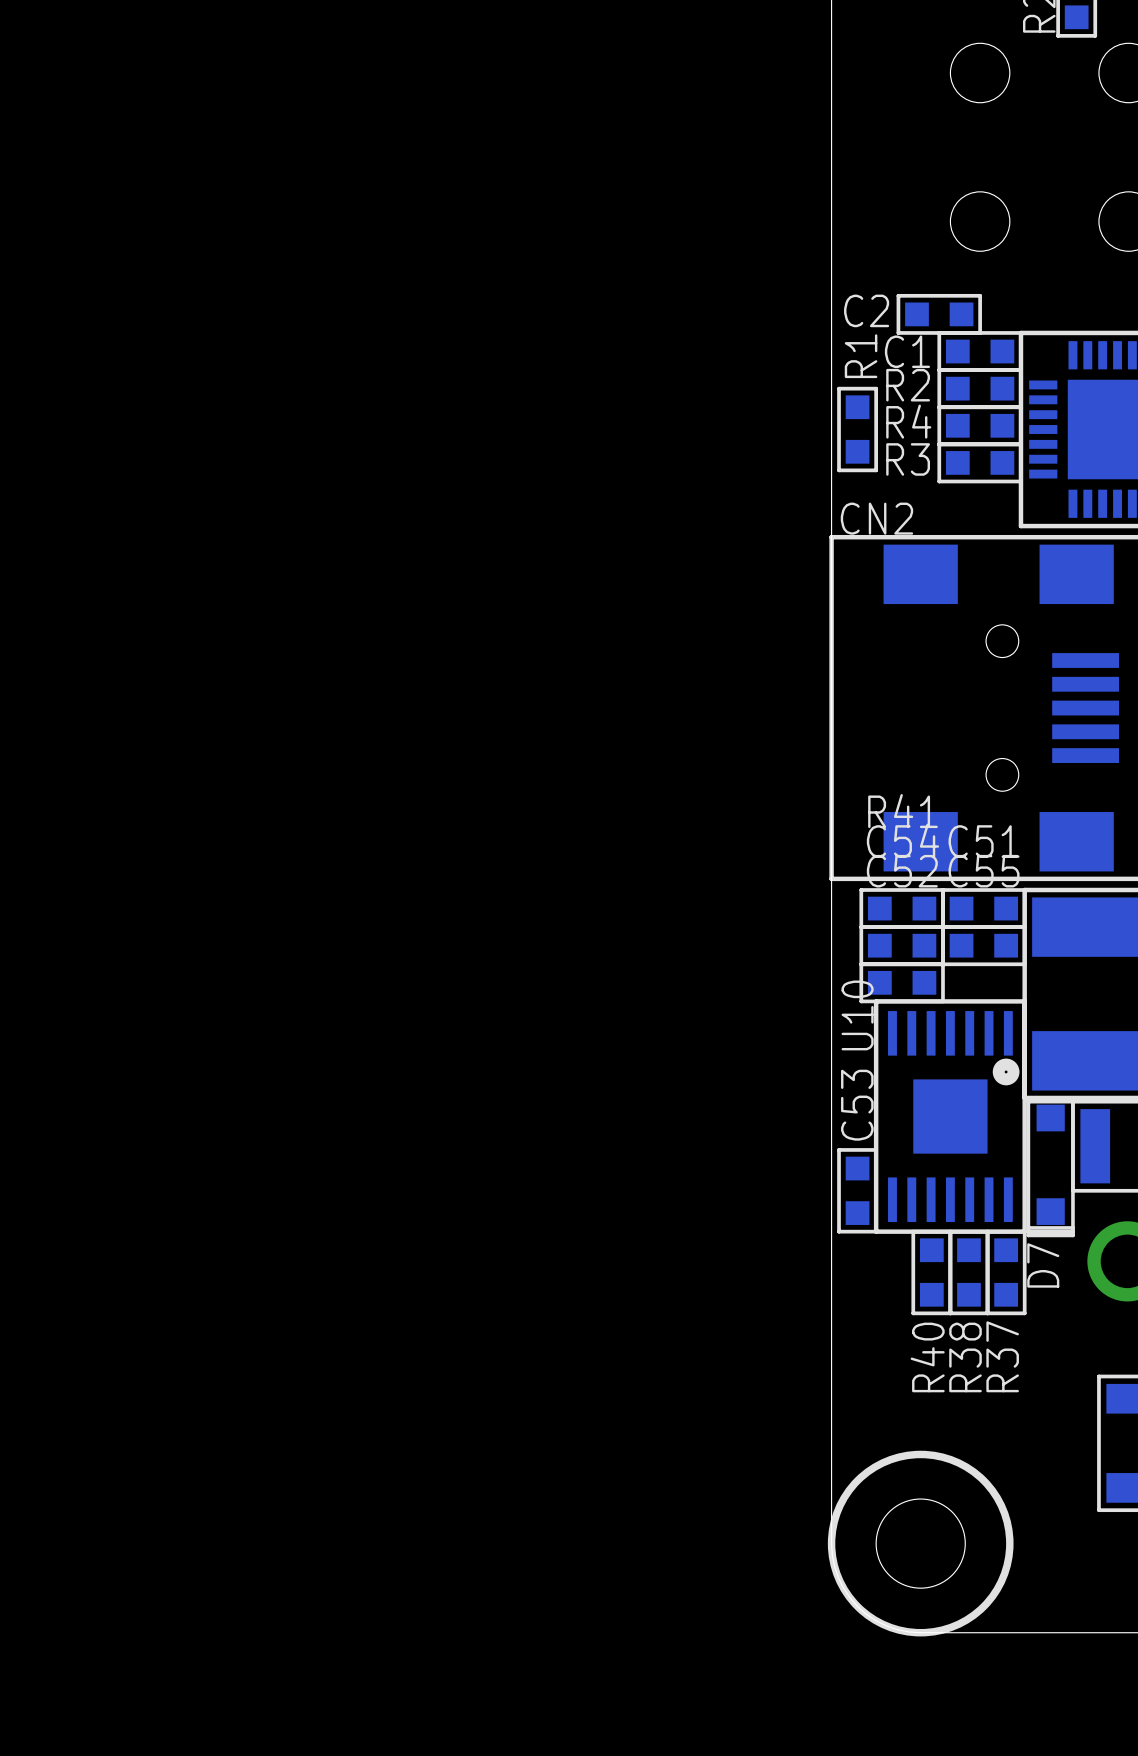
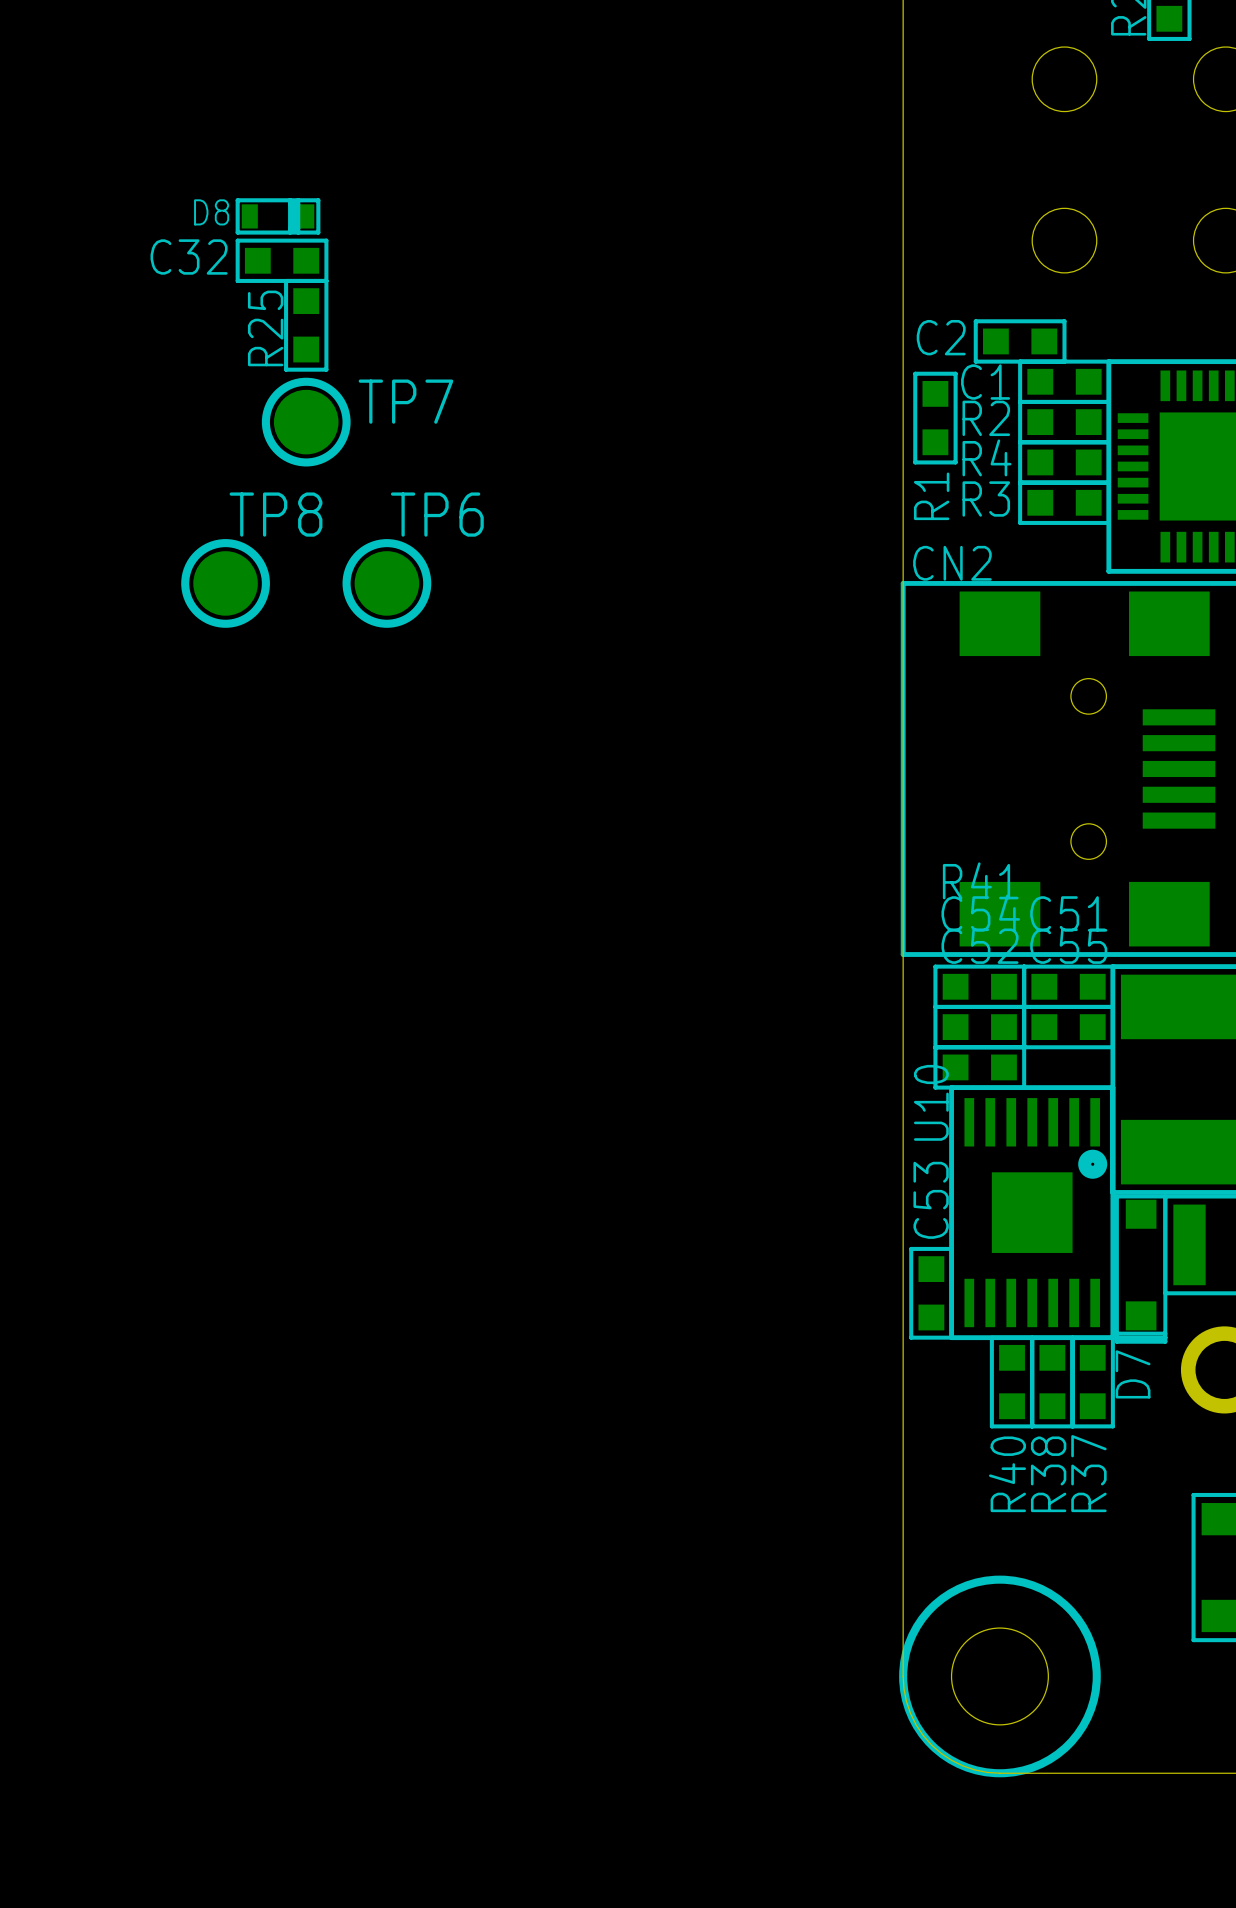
D8: none -> (278, 216)
C32: none -> (282, 260)
R25: none -> (306, 325)
R1 name position: R1 (861, 356) -> R1 (931, 496)
TP7: none -> (306, 422)
R1 position: (857, 429) -> (935, 418)
TP8: none -> (225, 583)
TP6: none -> (386, 583)

